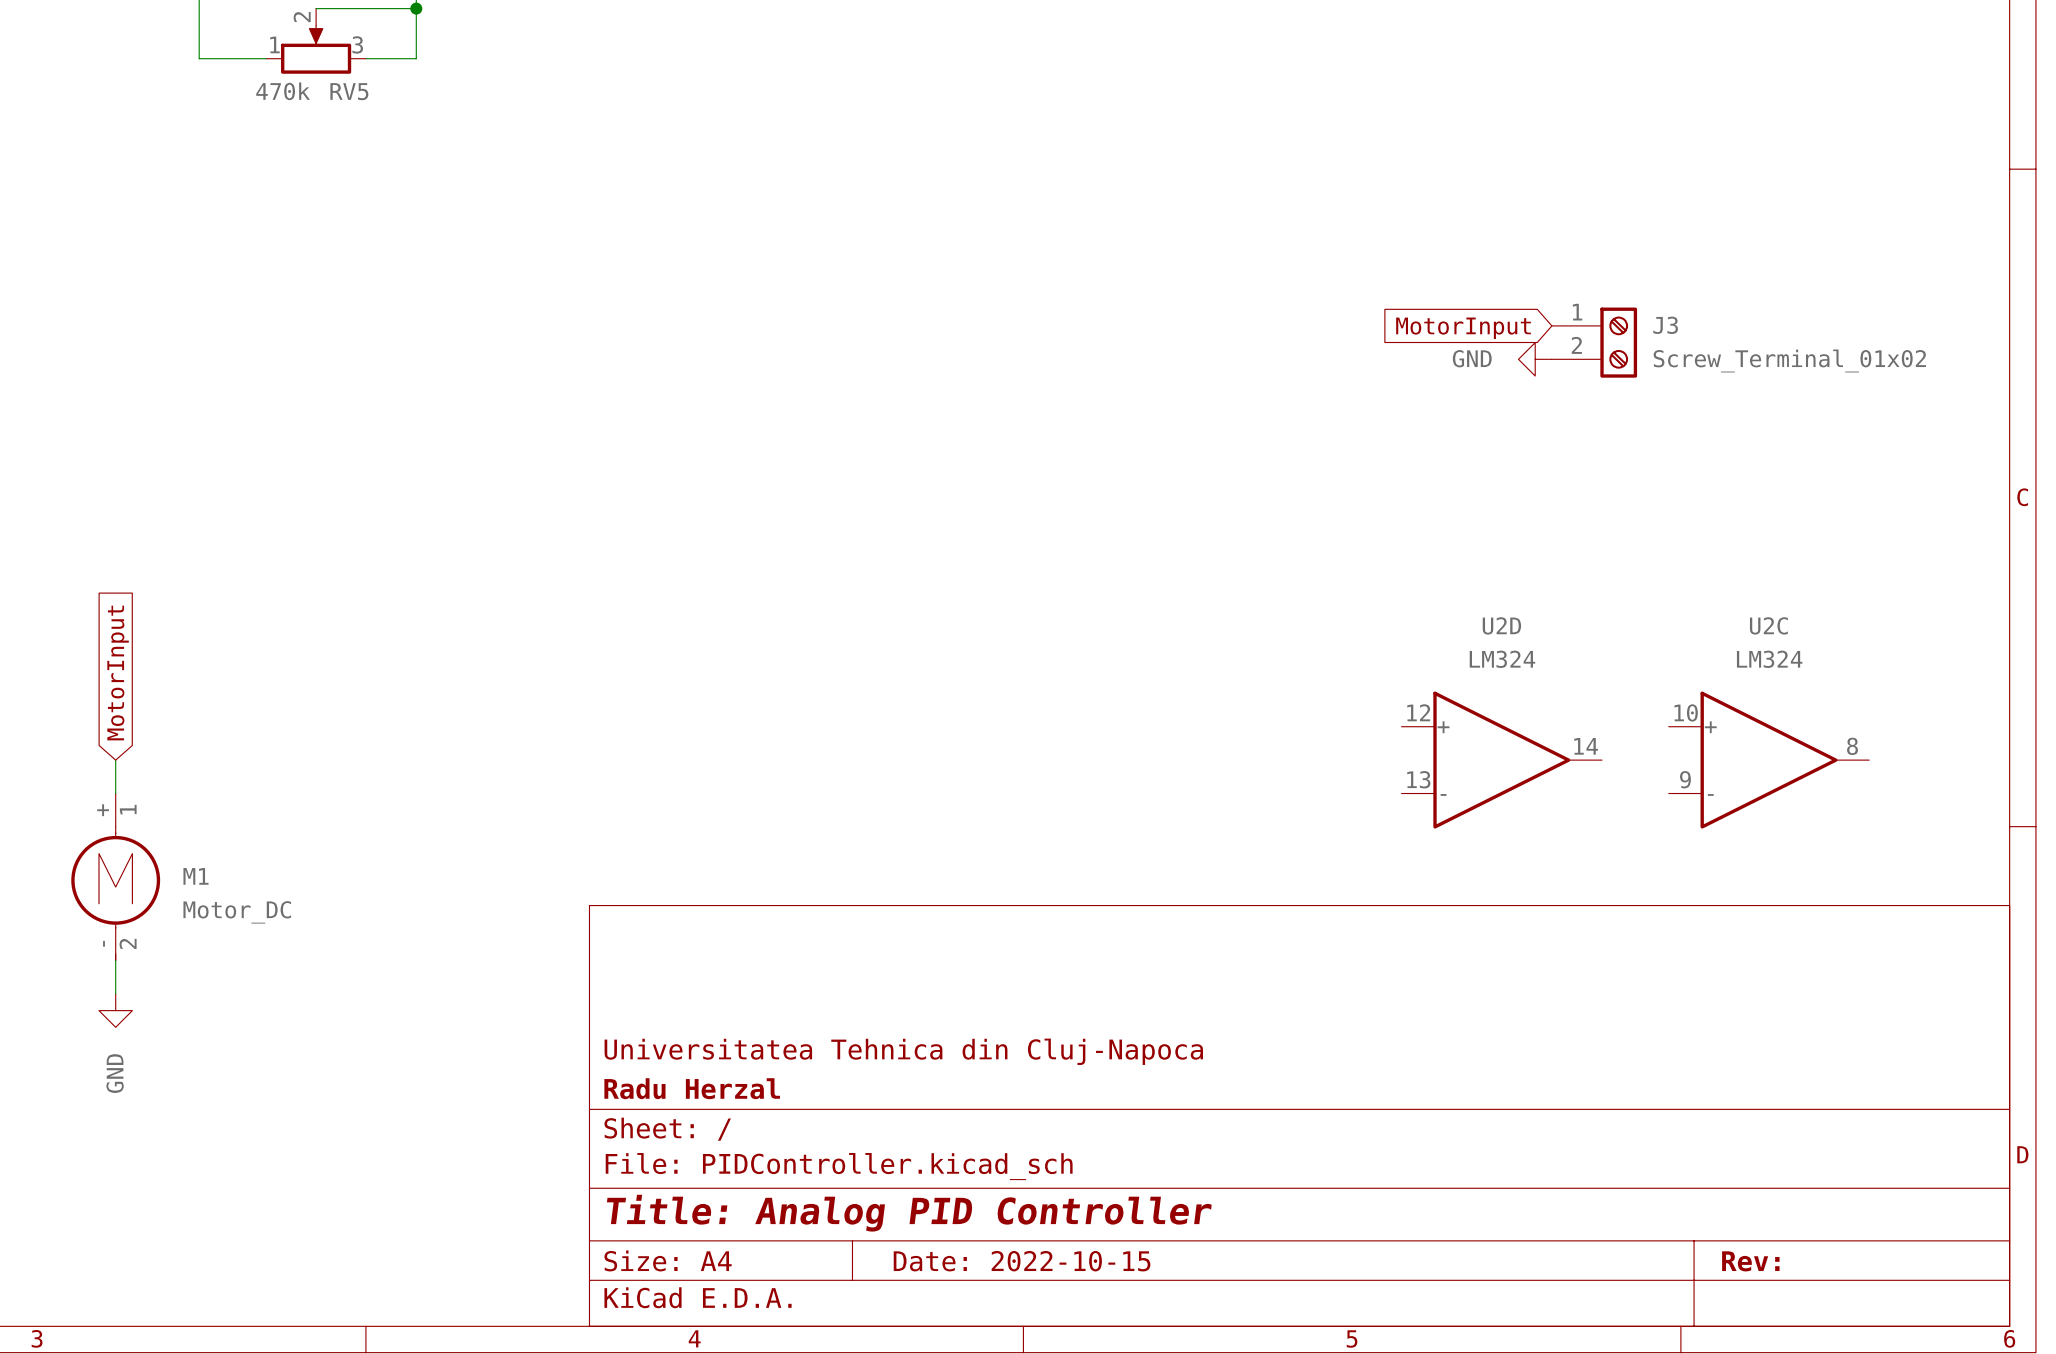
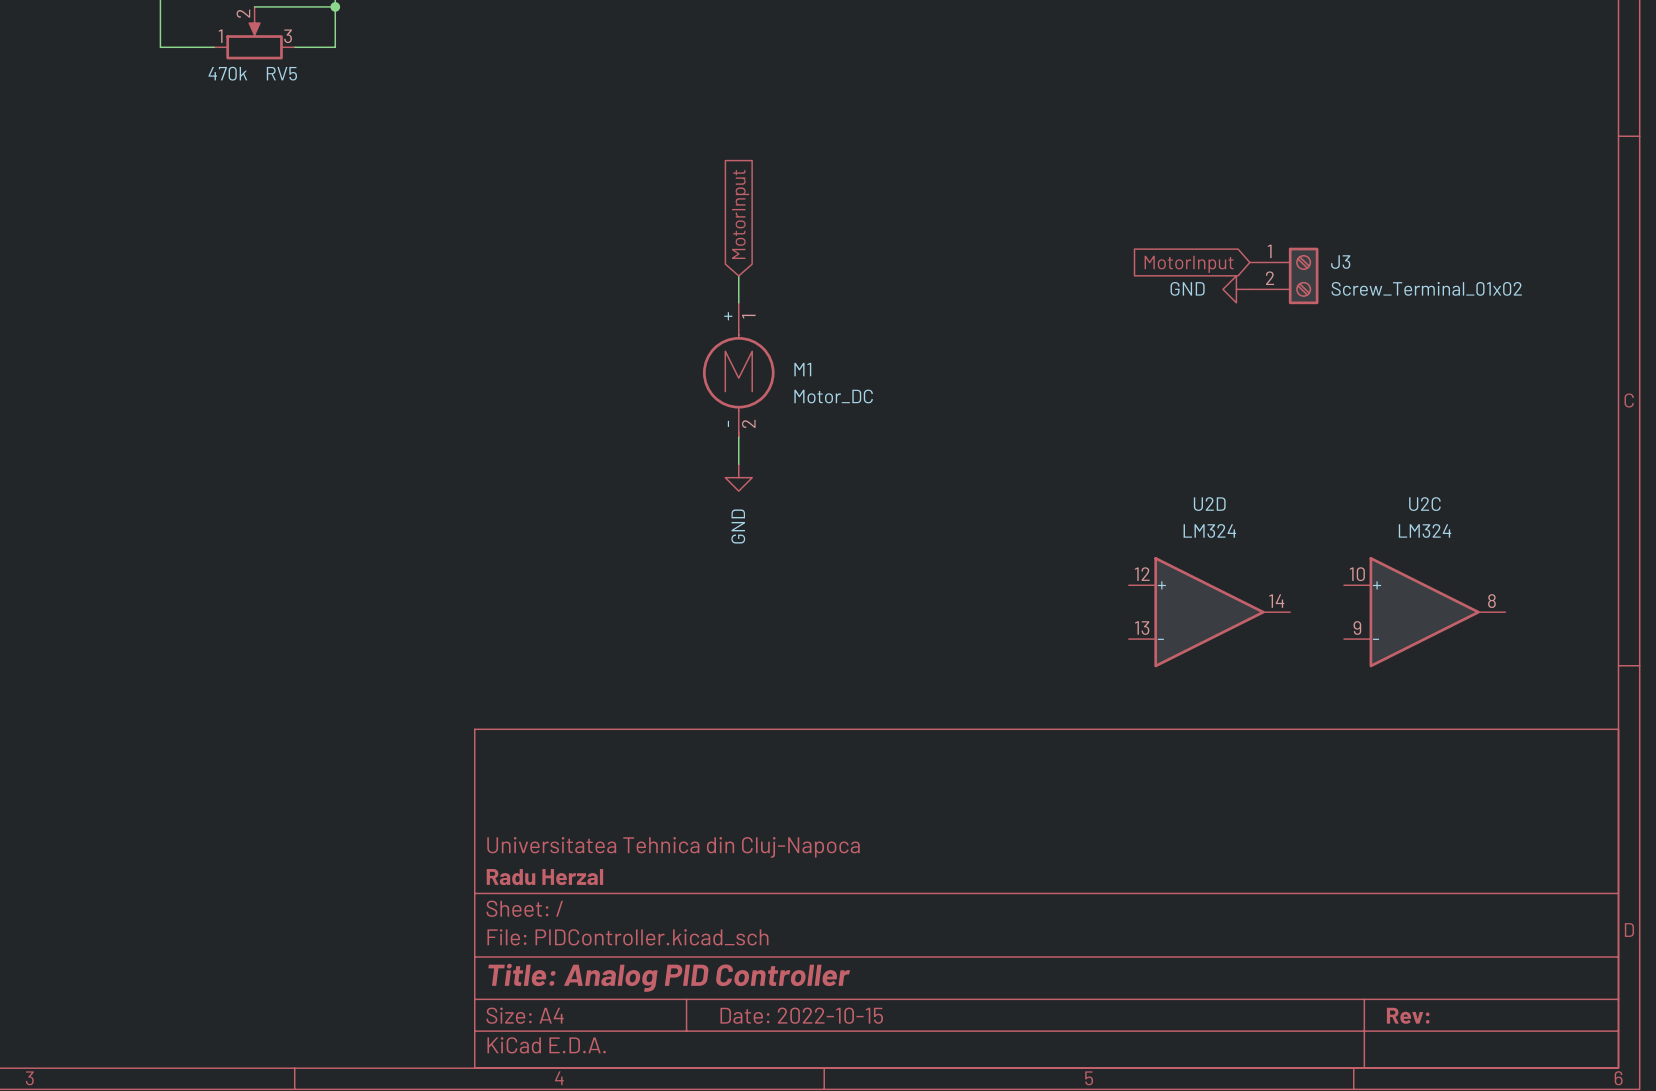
global label: none -> MotorInput (740, 214)
wire: none -> (738, 275) (738, 302)
wire: none -> (738, 437) (738, 464)
power symbol: none -> GND (738, 477)
global label: MotorInput (118, 673) -> none
wire: (115, 760) (115, 793) -> none
M1 position: (115, 877) -> (738, 370)
wire: (115, 960) (115, 993) -> none
power symbol: GND (115, 1010) -> none

